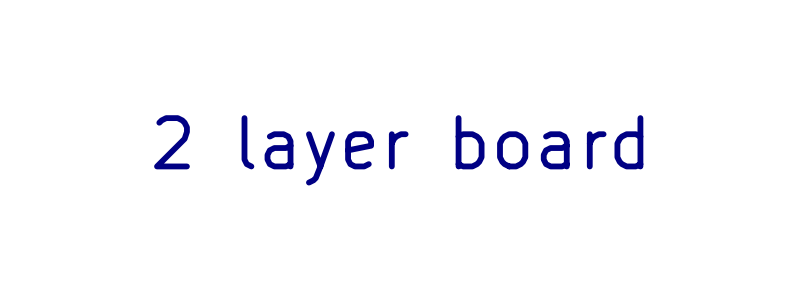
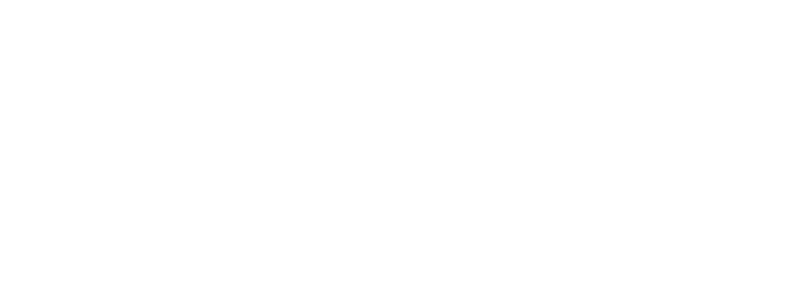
text: 2 layer board (398, 150) -> none

